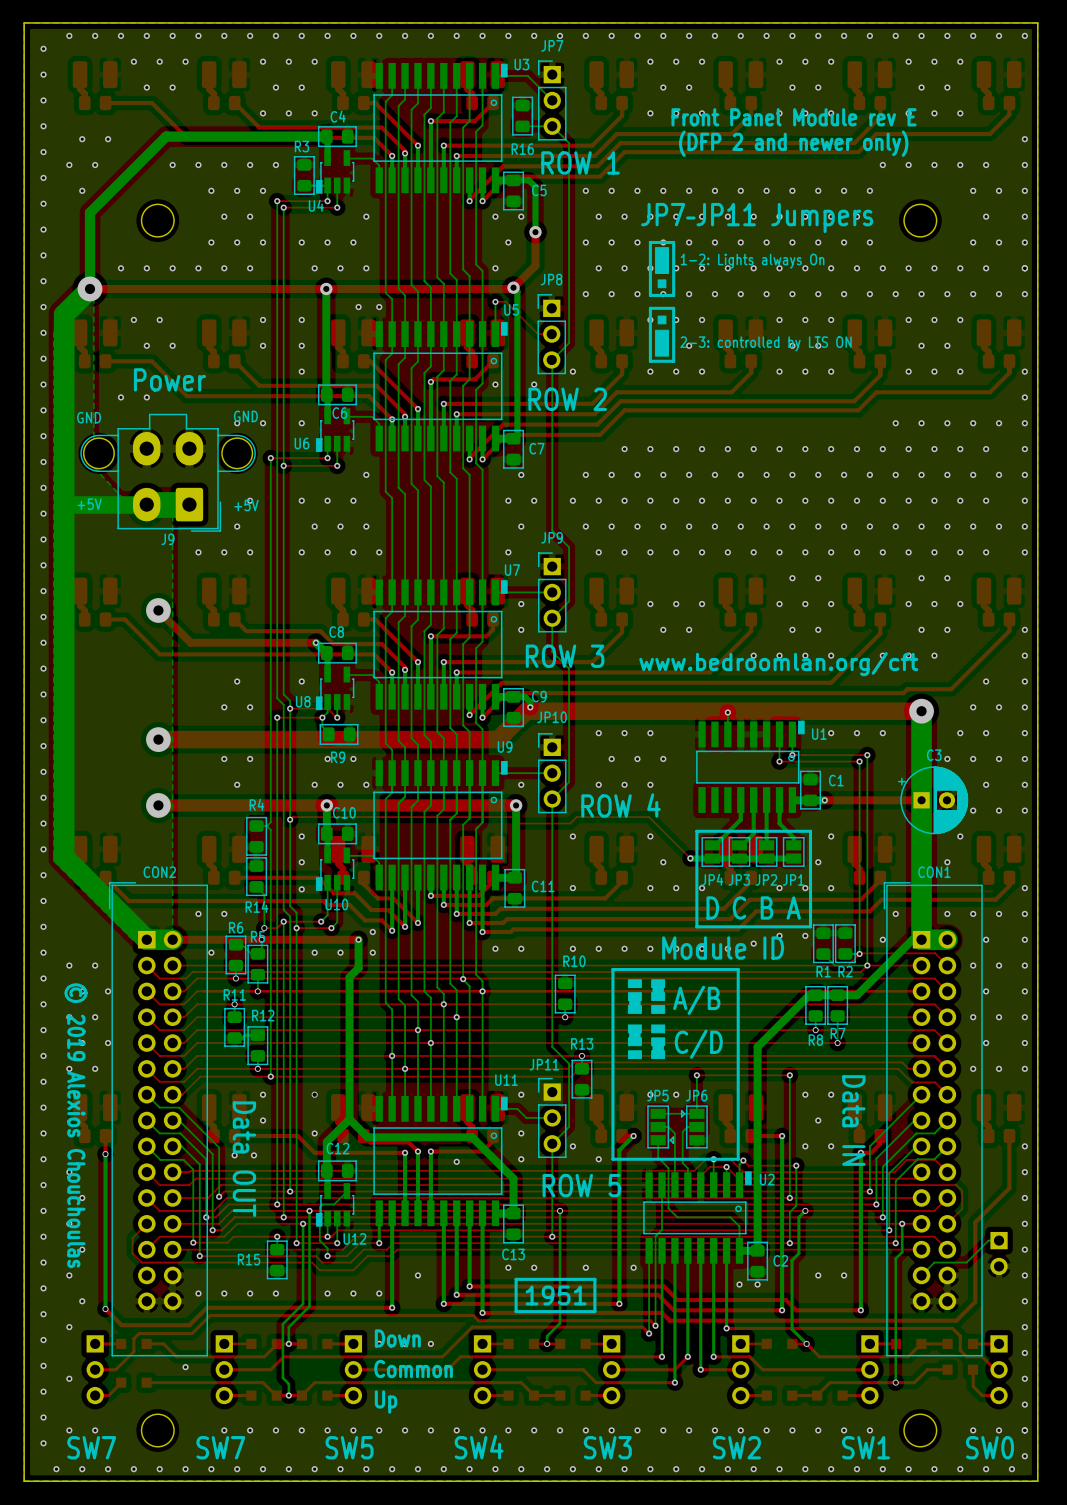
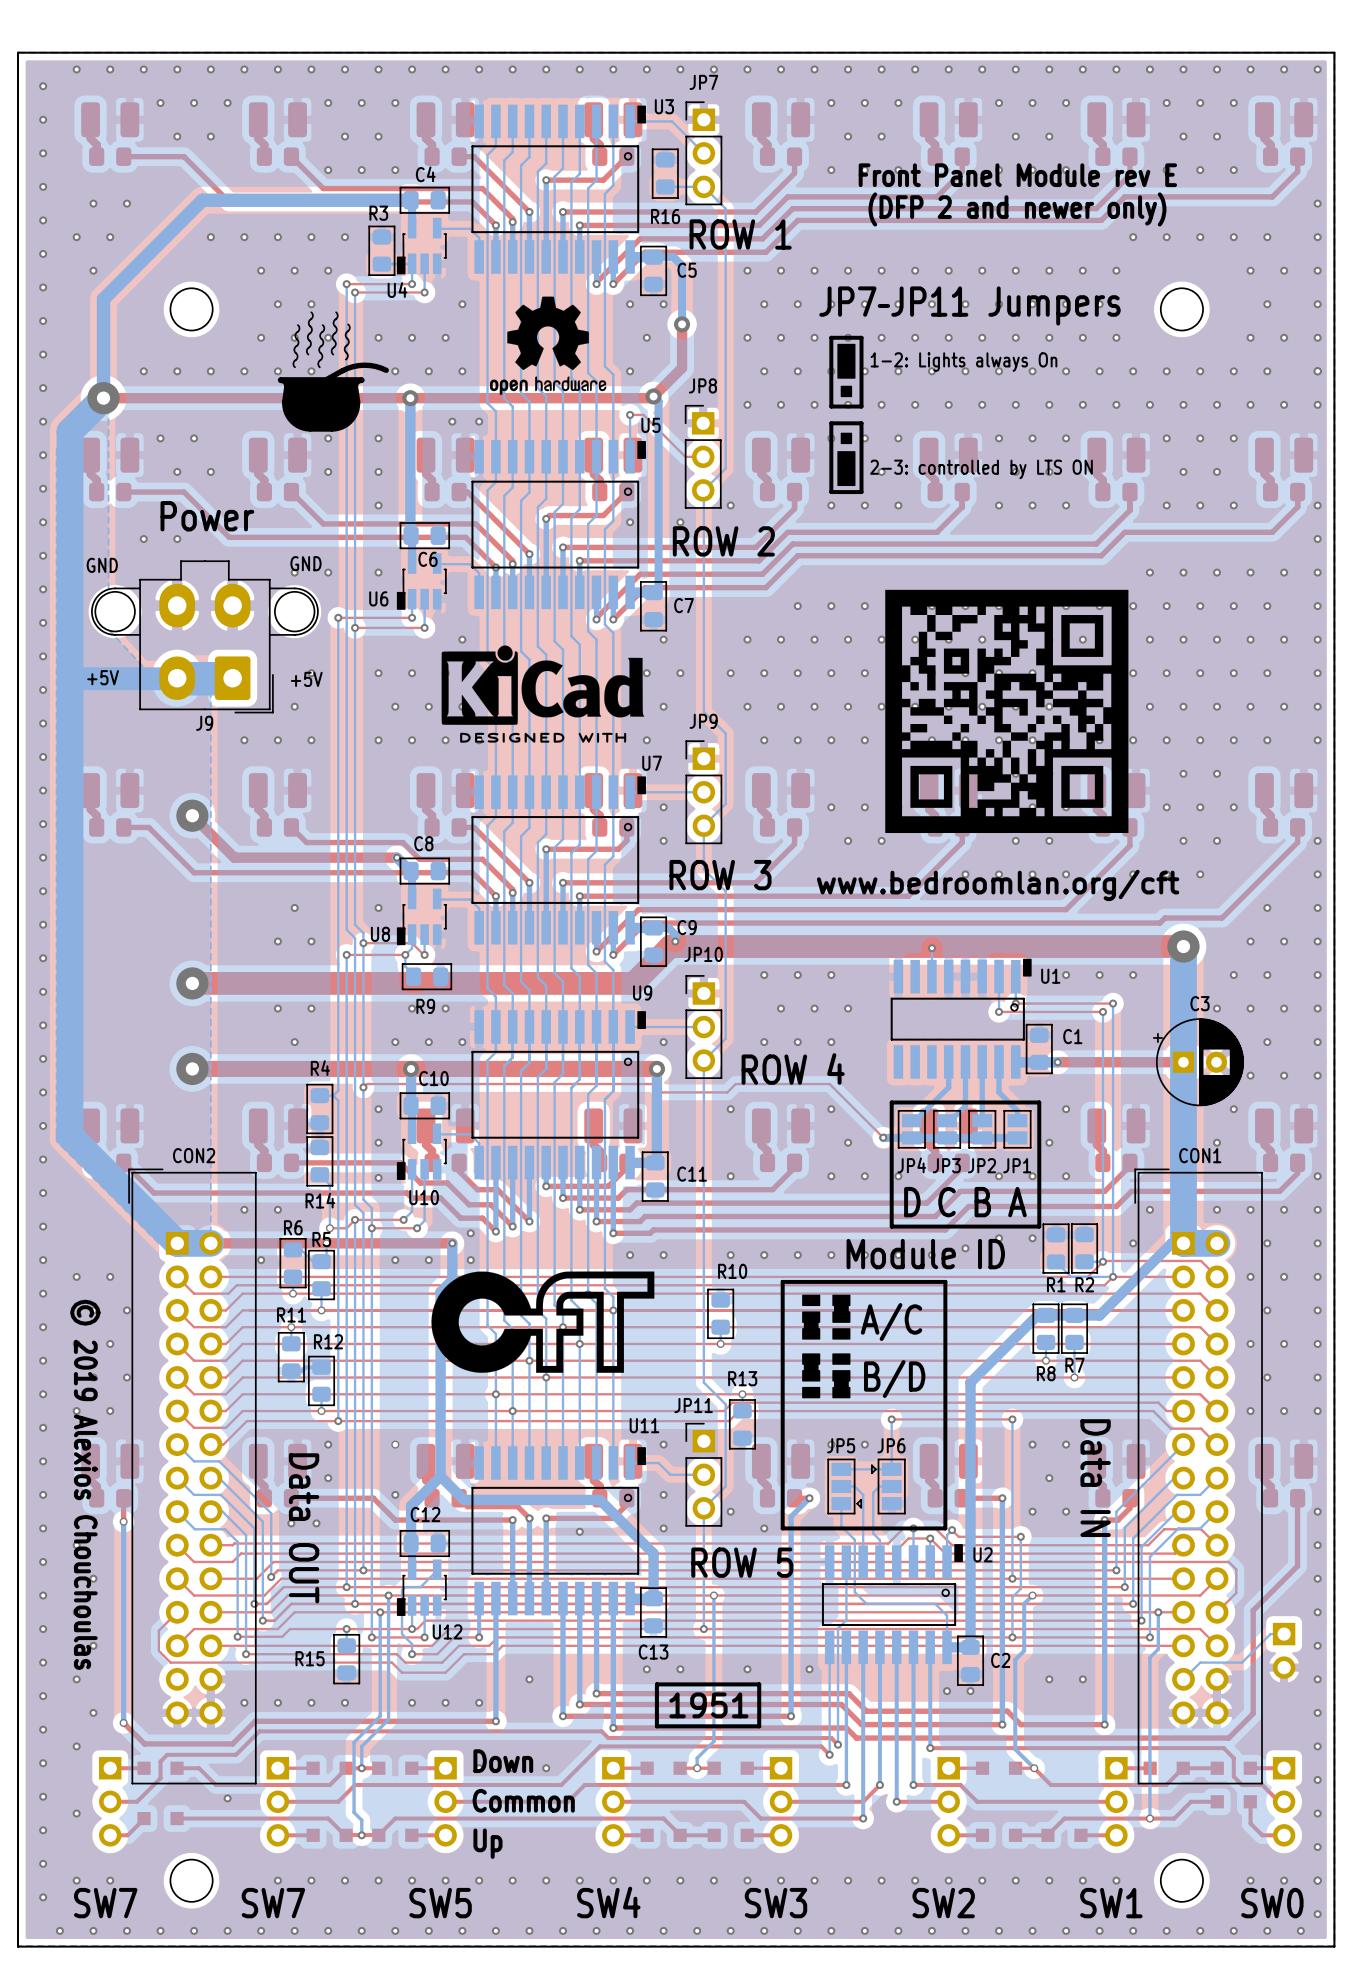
drawing: none -> [489, 296, 607, 396]
drawing: none -> [277, 311, 389, 432]
drawing: none -> [885, 589, 1129, 834]
drawing: none -> [441, 645, 645, 743]
drawing: none -> [431, 1271, 655, 1373]
text: A/B (696, 1000) -> A/C (891, 1322)
text: C/D (698, 1044) -> B/D (894, 1379)

